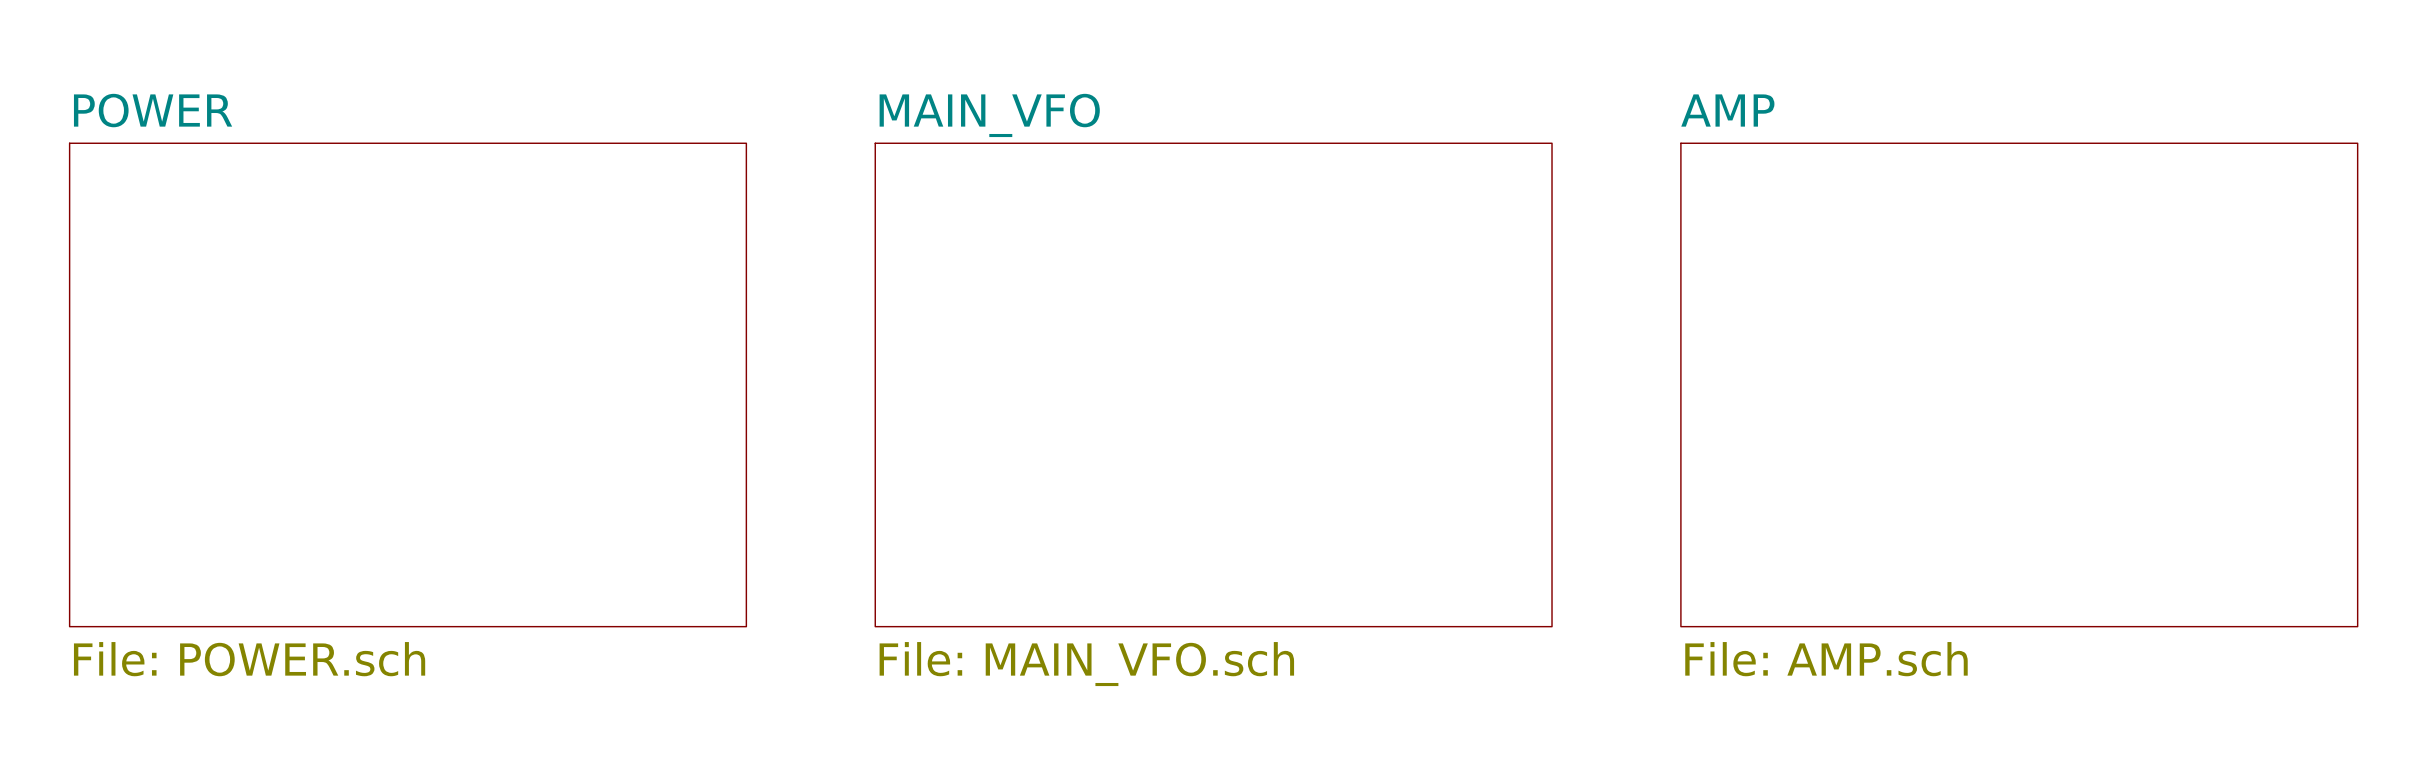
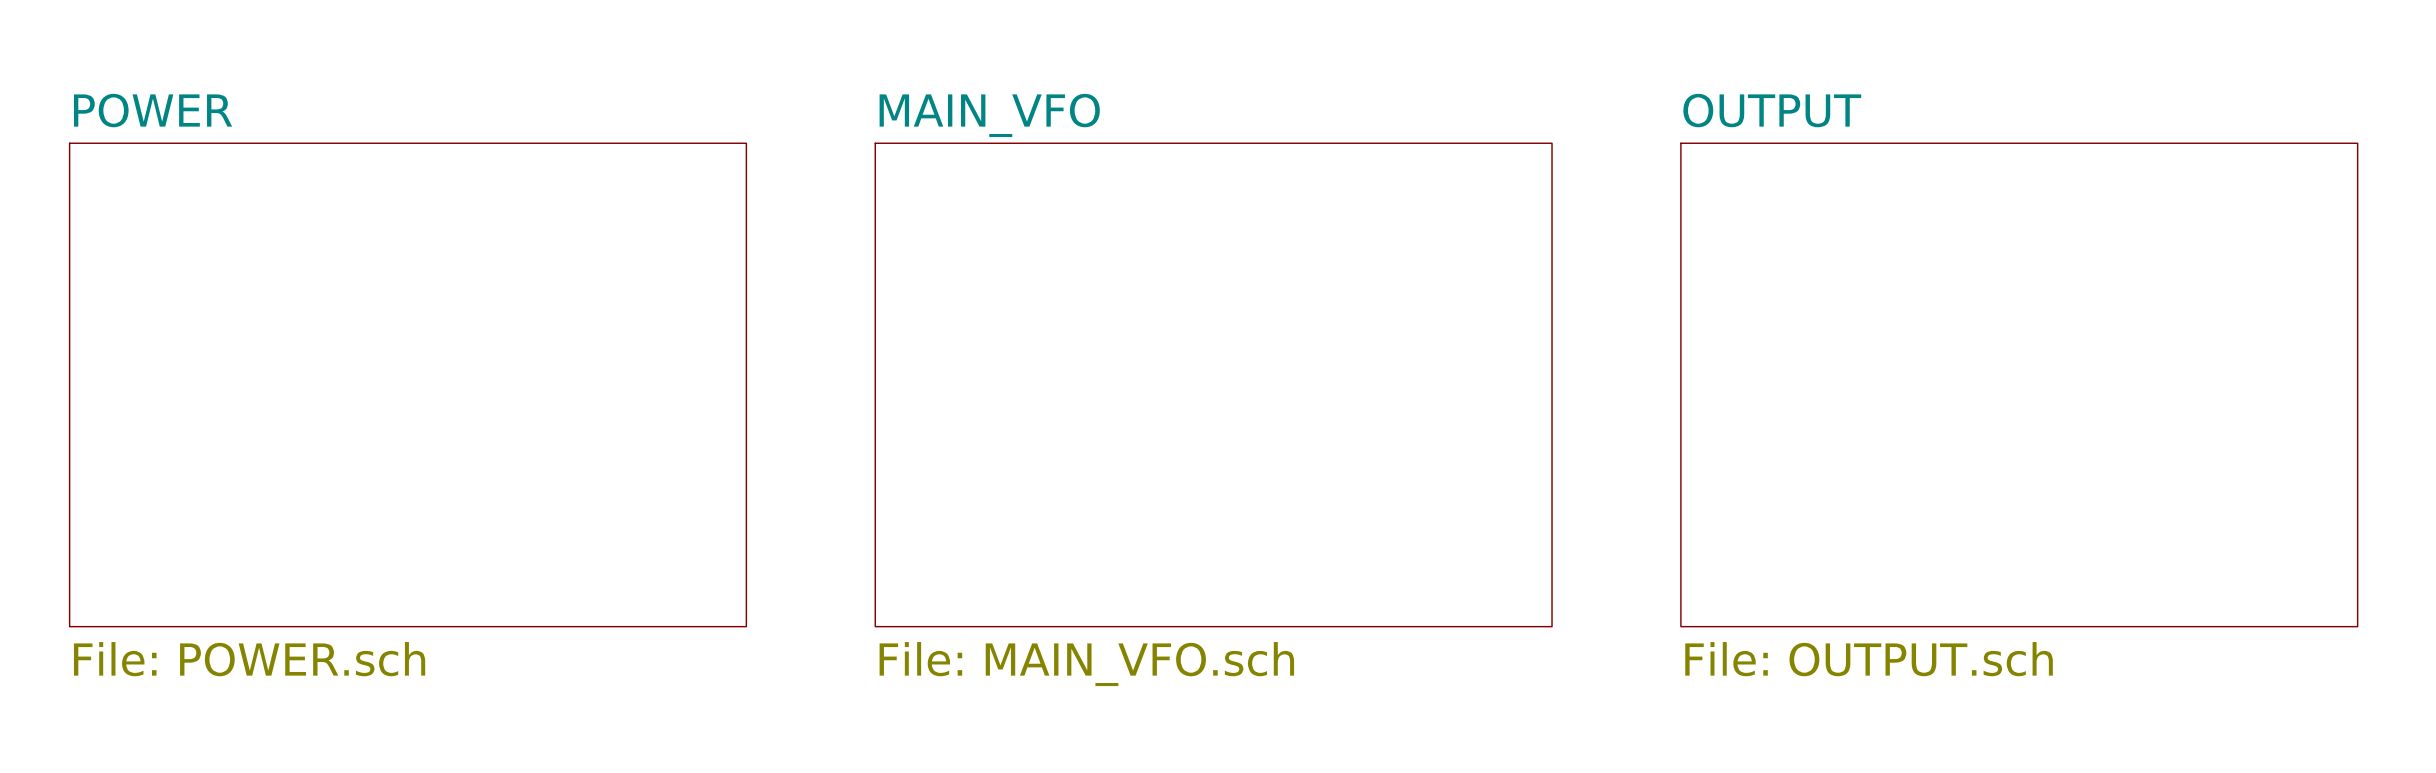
sheet AMP name: AMP (1727, 110) -> OUTPUT (1772, 110)
sheet AMP value: File: AMP.sch (1826, 659) -> File: OUTPUT.sch (1869, 659)

